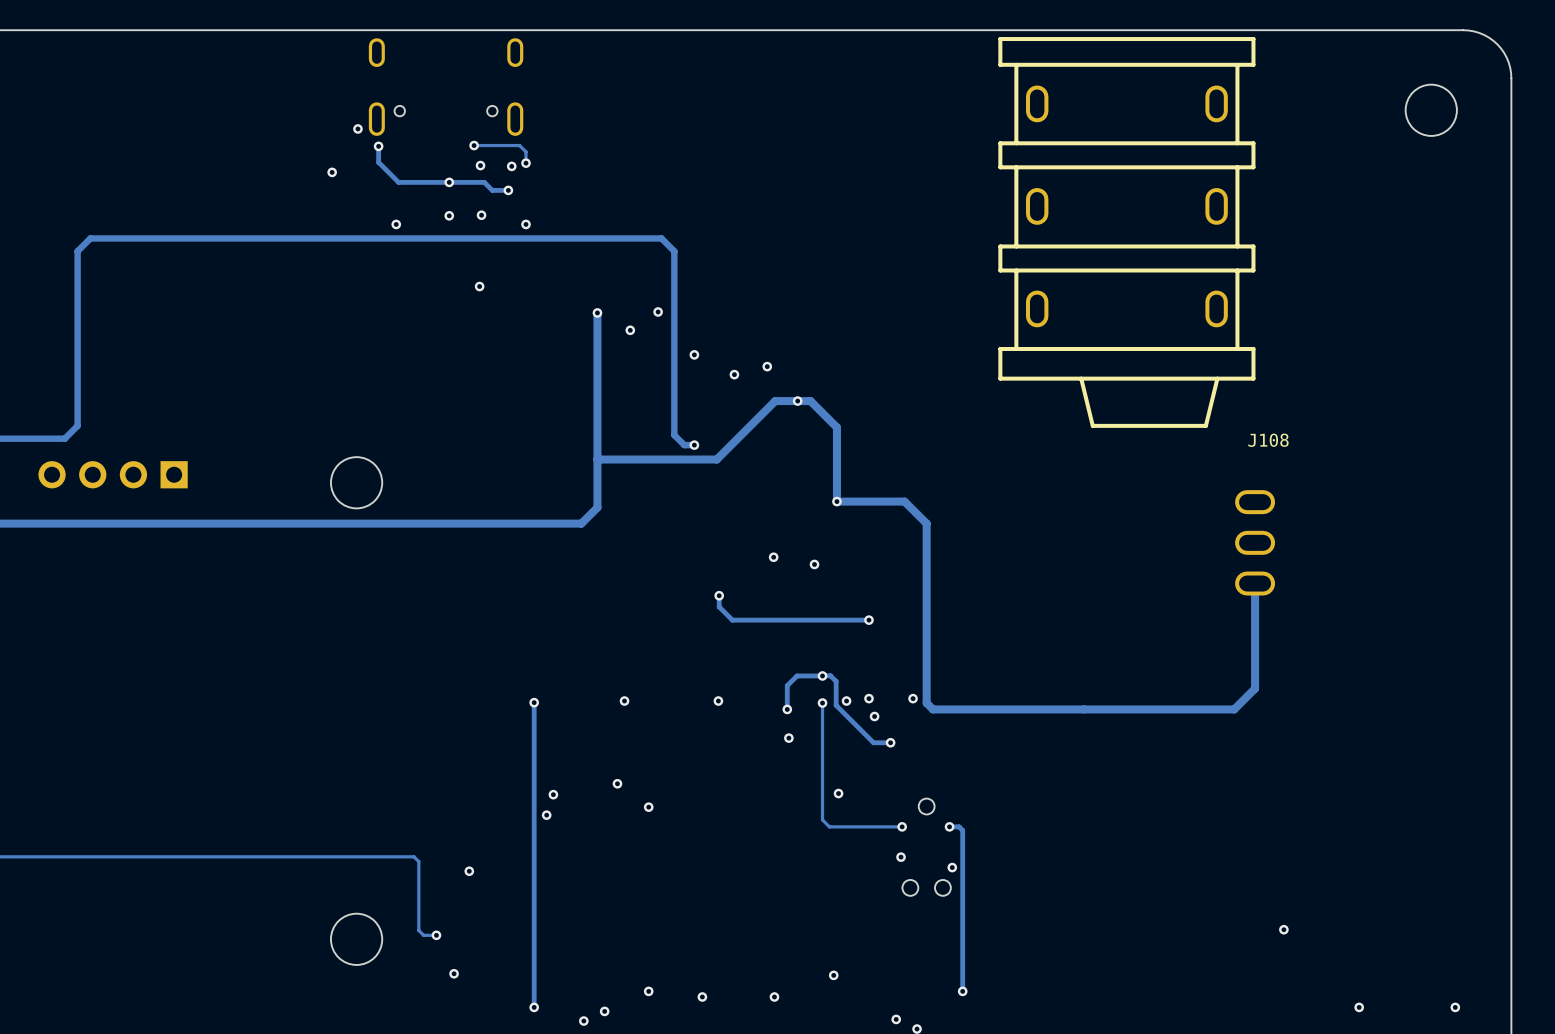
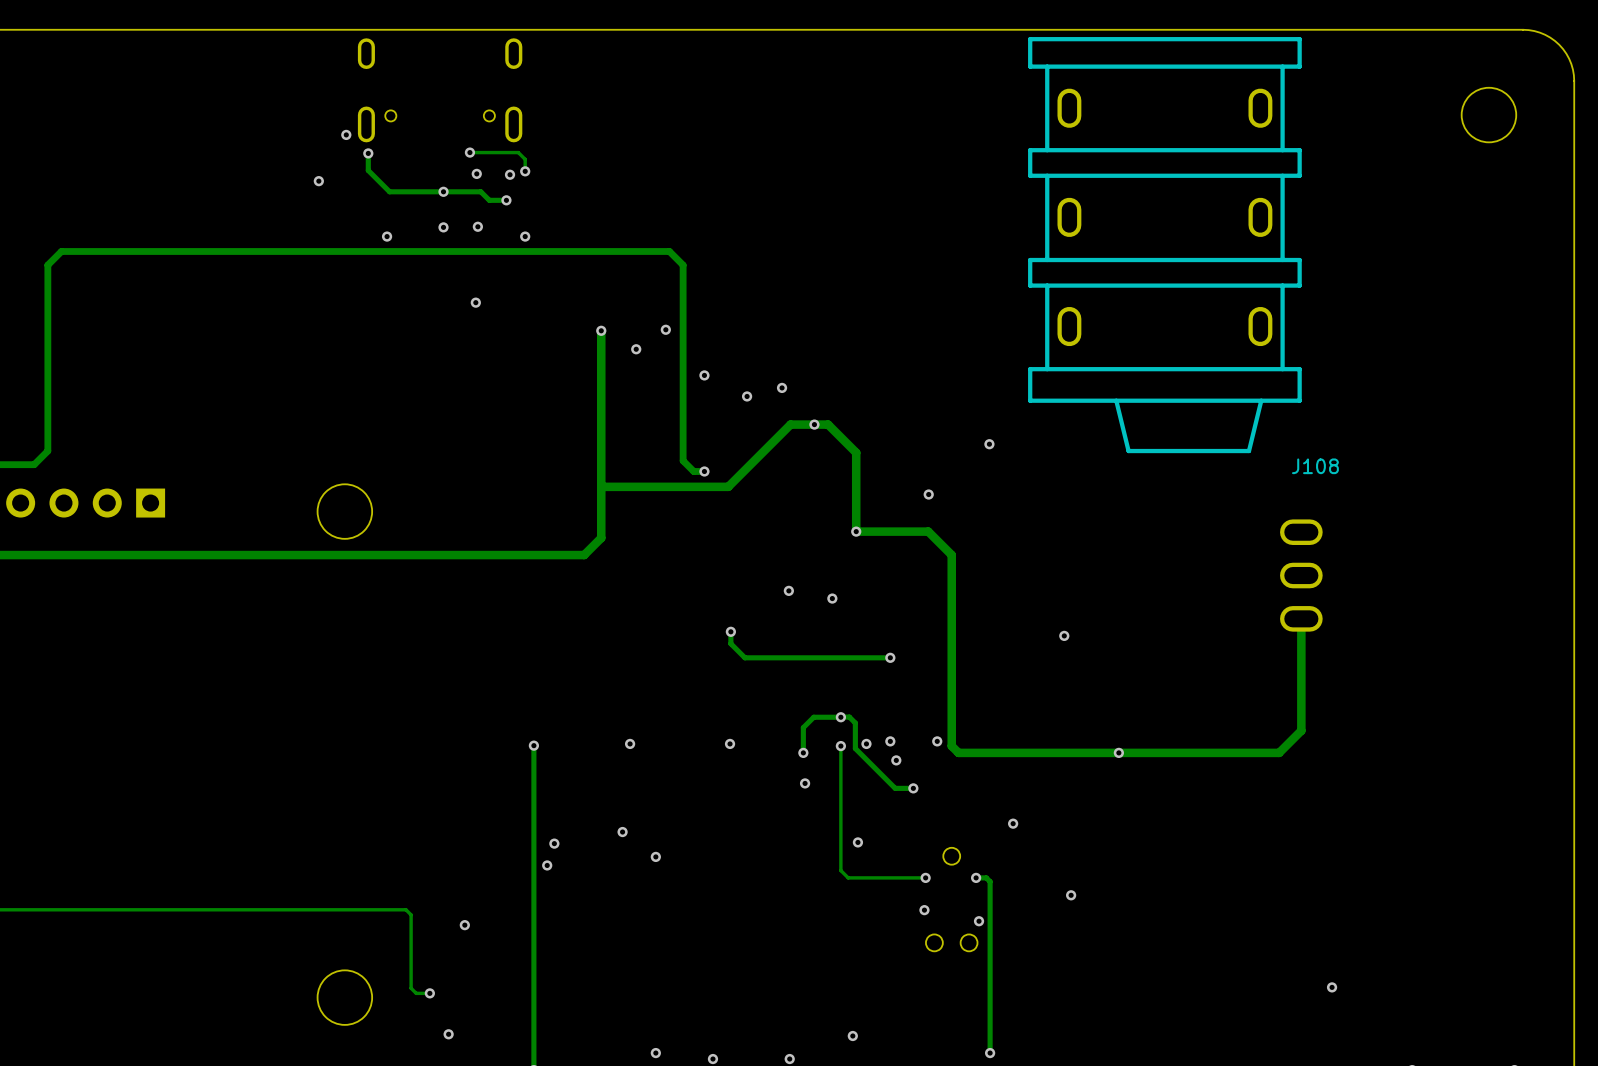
via: none -> (989, 444)
via: none -> (928, 494)
via: none -> (1064, 635)
via: none -> (1118, 752)
via: none -> (1013, 823)
via: none -> (1071, 895)

